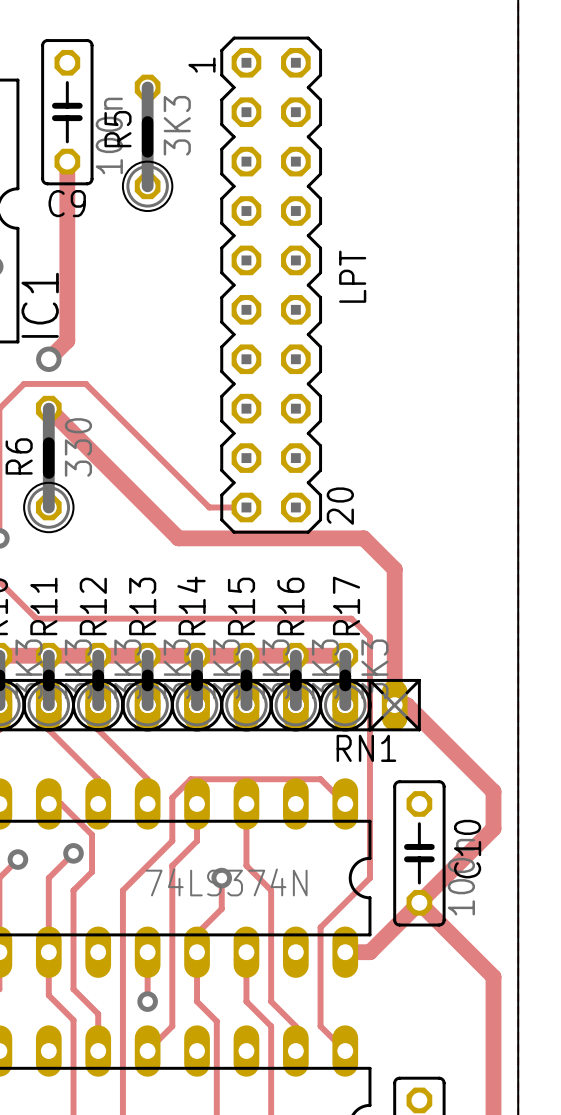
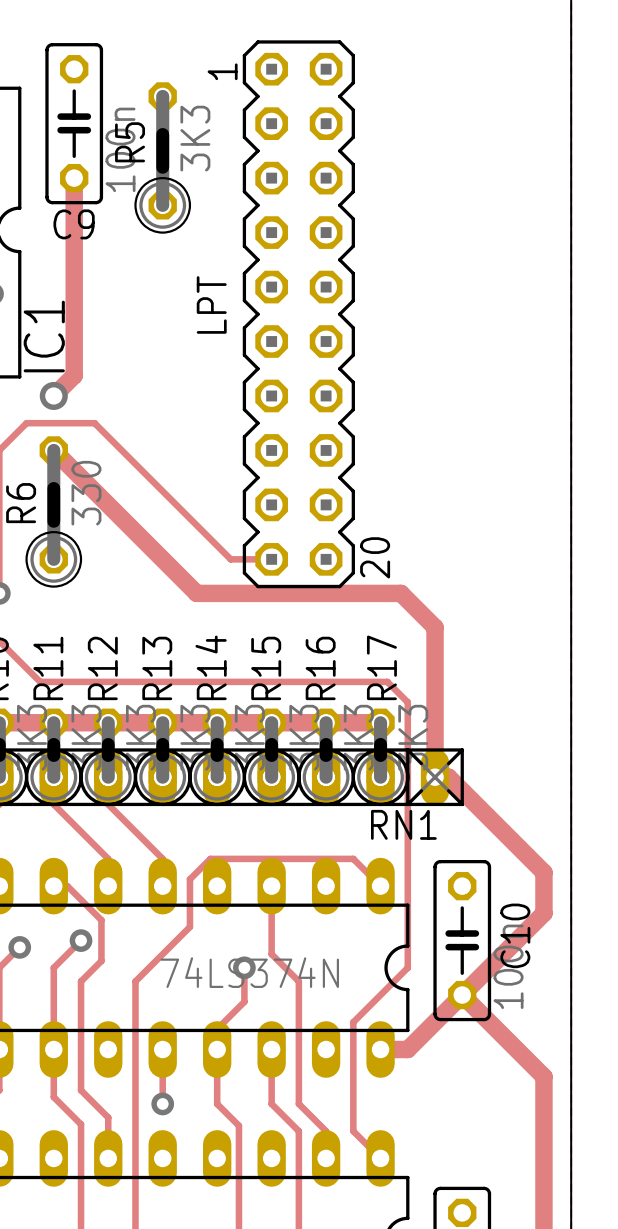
LPT name position: LPT (352, 276) -> LPT (211, 304)
track: (197, 803) (197, 841) (172, 865) (172, 1026) (147, 1051) -> none

